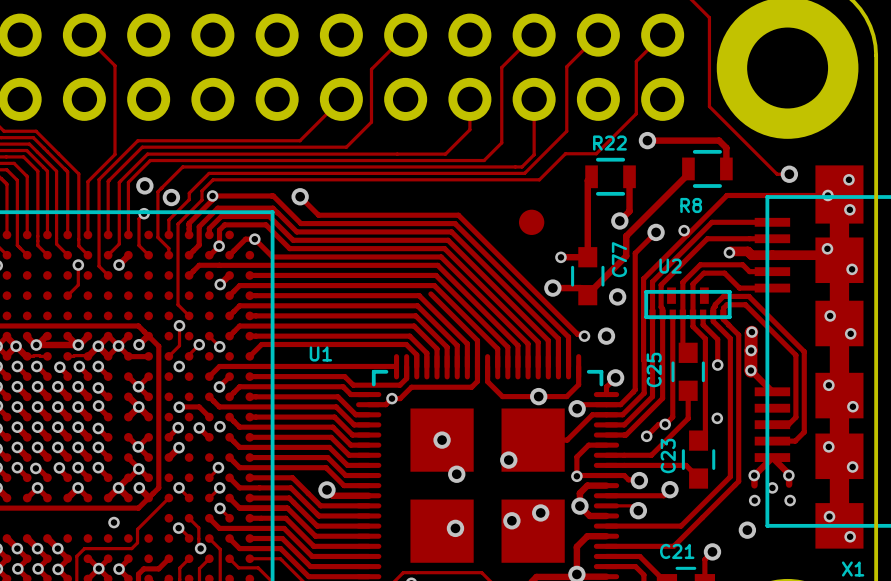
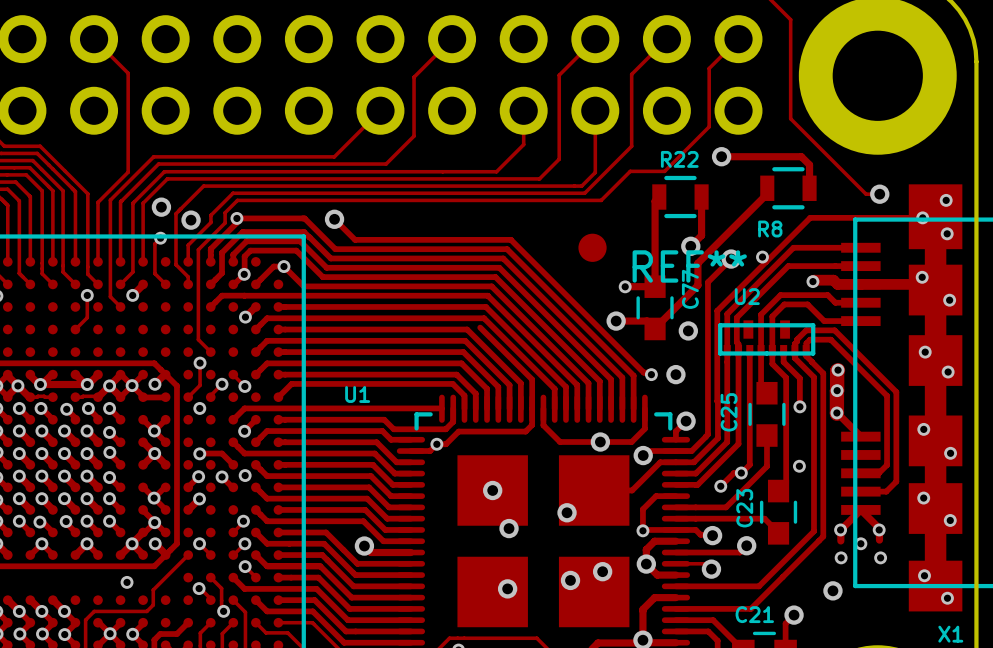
REF** name: none -> REF** (689, 266)

